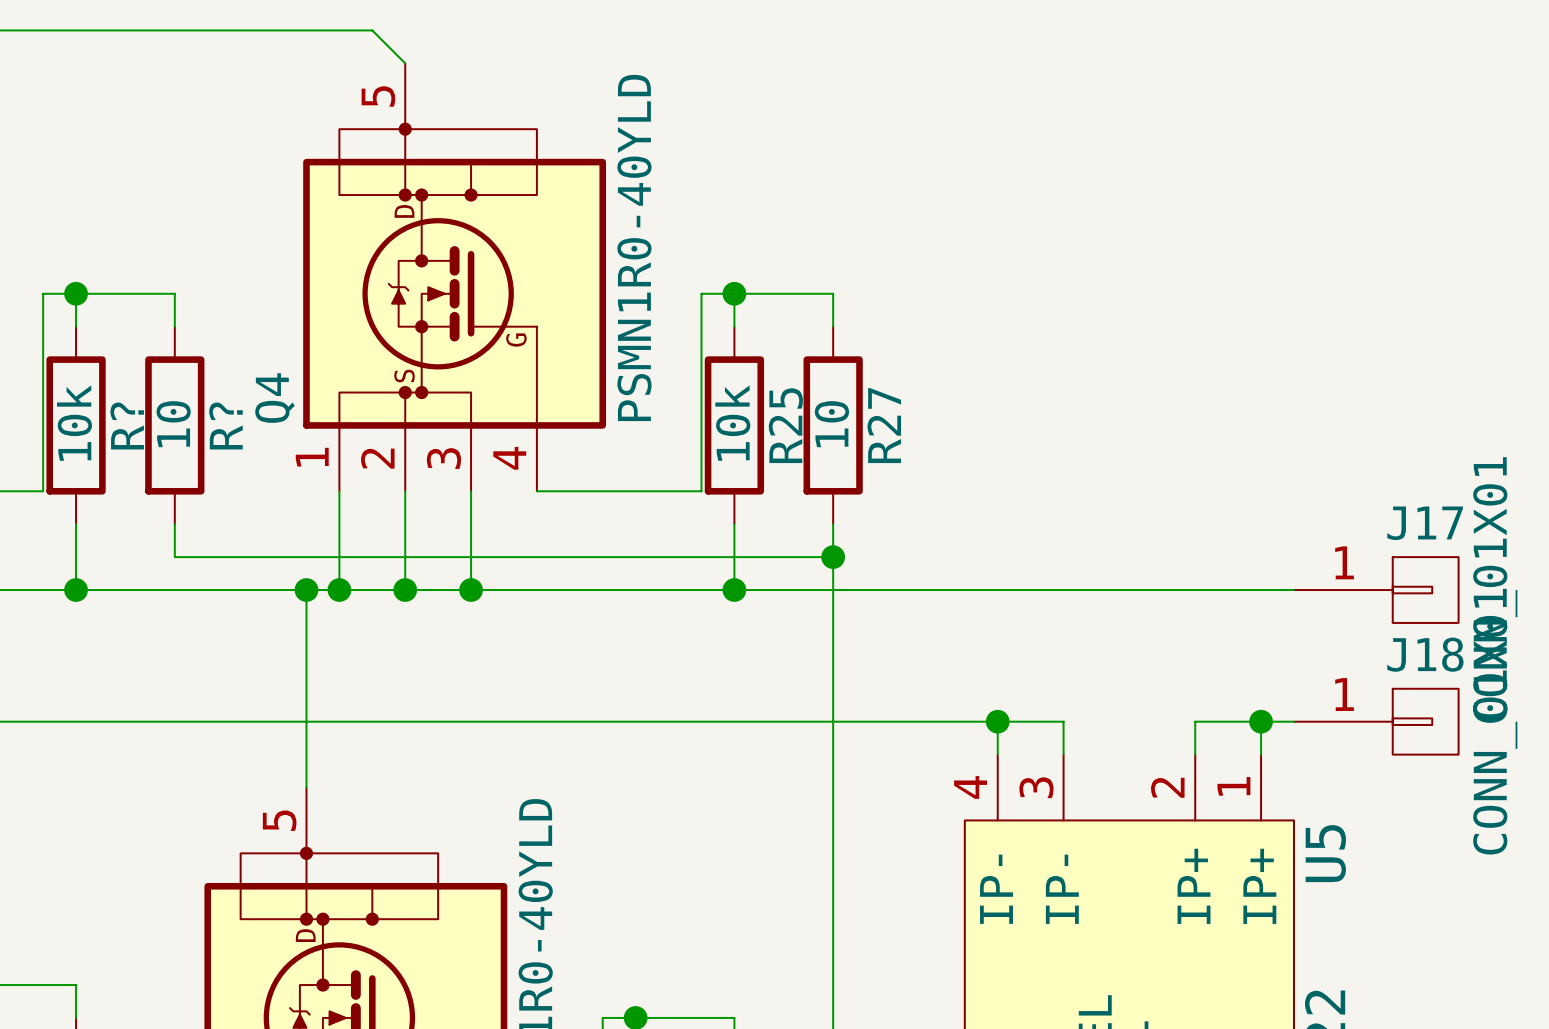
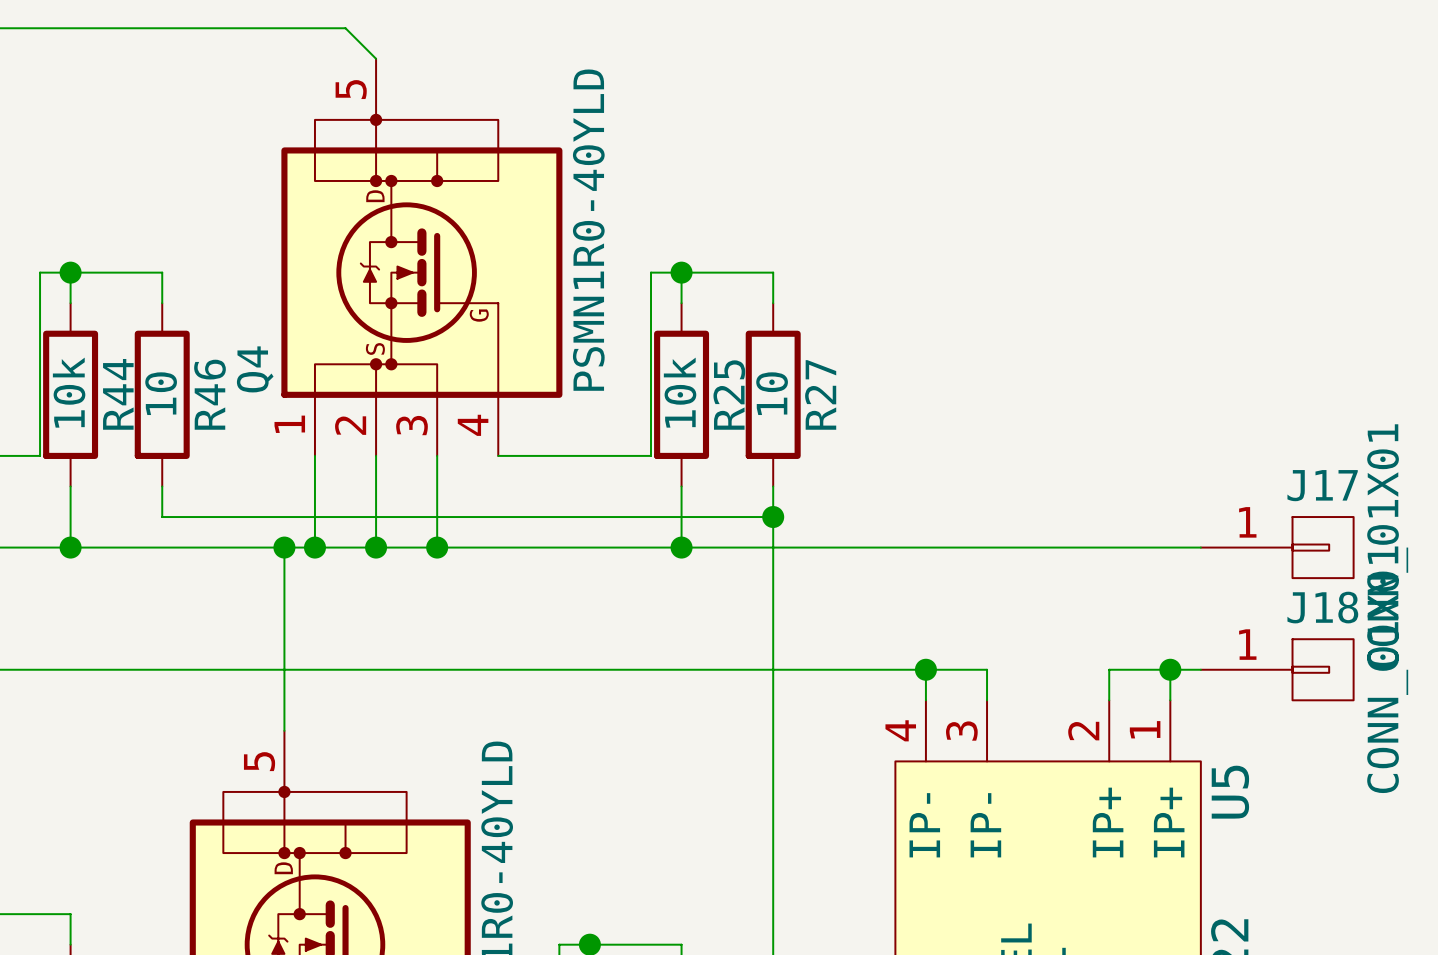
R? name: R? (127, 425) -> R44 (118, 394)
R? name: R? (225, 425) -> R46 (209, 394)

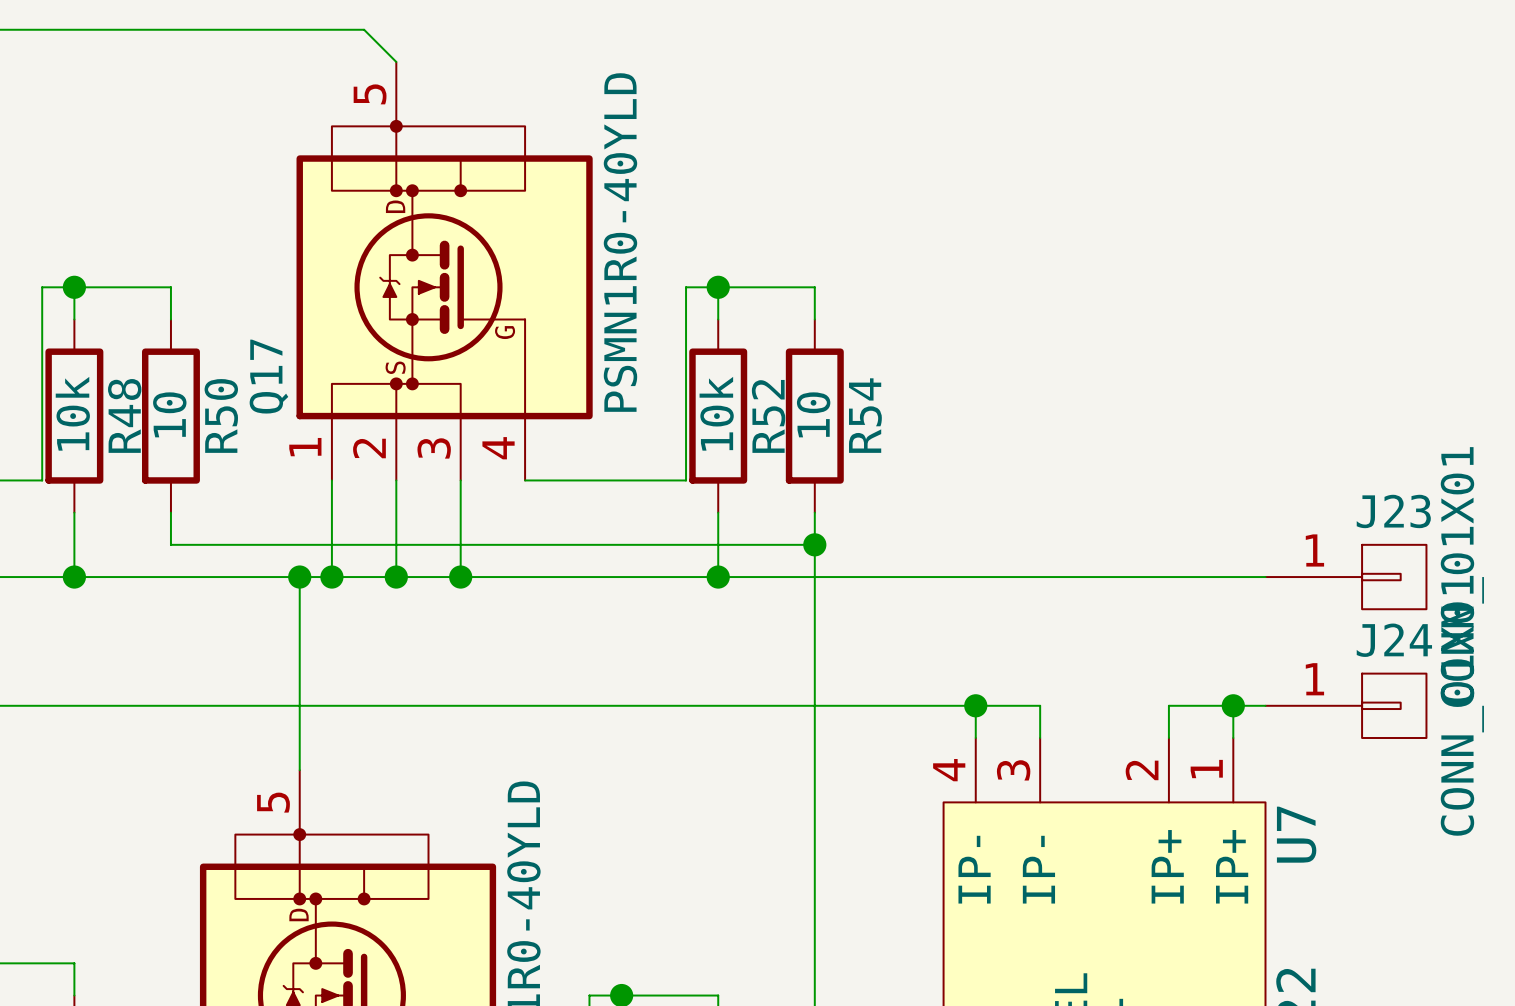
Q4 name: Q4 (255, 369) -> Q17 (268, 376)
R44 name: R44 (118, 394) -> R48 (124, 415)
R46 name: R46 (209, 394) -> R50 (221, 415)
R27 name: R27 (820, 394) -> R54 (865, 415)
R25 name: R25 (729, 395) -> R52 (768, 416)
J17 name: J17 (1322, 485) -> J23 (1393, 511)
J18 name: J18 (1322, 607) -> J24 (1394, 640)
U5 name: U5 (1230, 792) -> U7 (1296, 834)

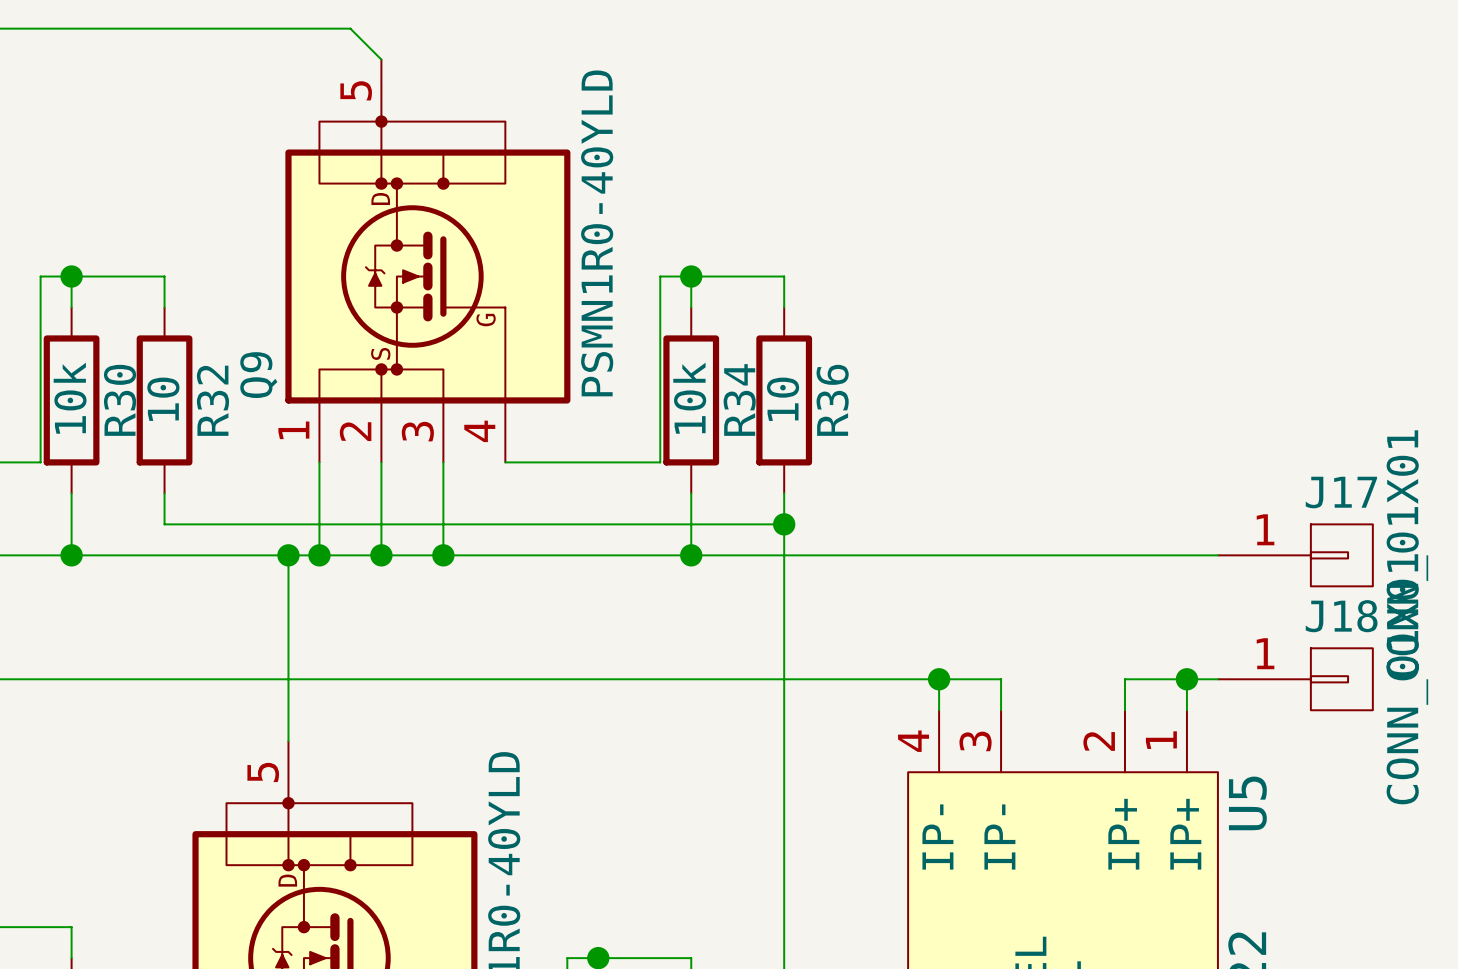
Q17 name: Q17 (268, 376) -> Q9 (258, 375)
R48 name: R48 (124, 415) -> R30 (120, 400)
R50 name: R50 (221, 415) -> R32 (212, 400)
R54 name: R54 (865, 415) -> R36 (832, 400)
R52 name: R52 (768, 416) -> R34 (739, 399)
J23 name: J23 (1393, 511) -> J17 (1341, 492)
J24 name: J24 (1394, 640) -> J18 (1341, 616)
U7 name: U7 (1296, 834) -> U5 (1247, 803)

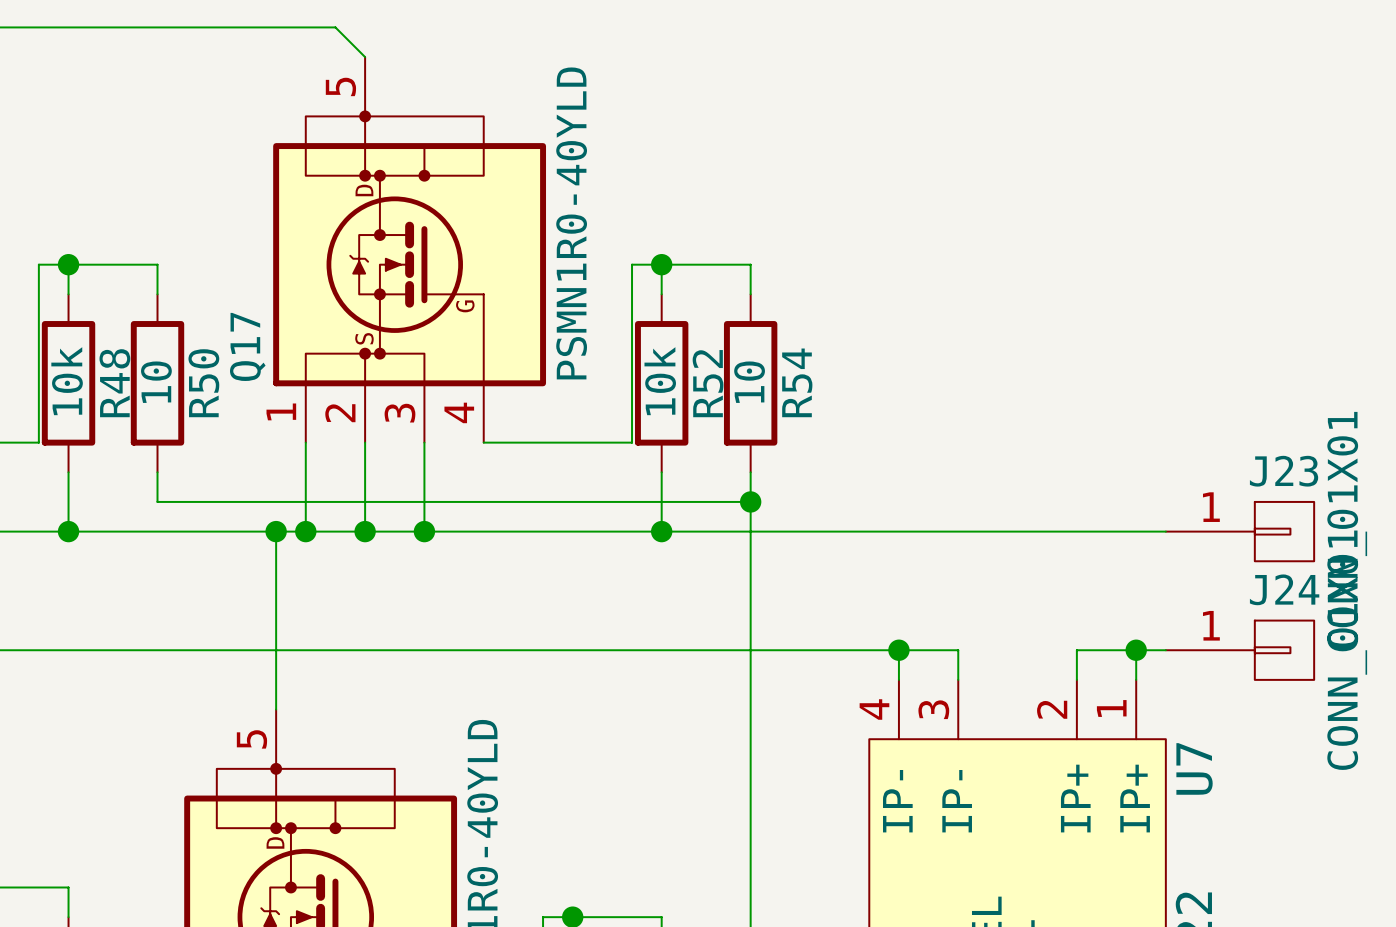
Q9 name: Q9 (258, 375) -> Q17 (247, 346)
R34 name: R34 (739, 399) -> R52 (708, 383)
R30 name: R30 (120, 400) -> R48 (114, 383)
R32 name: R32 (212, 400) -> R50 (203, 383)
R36 name: R36 (832, 400) -> R54 (797, 382)
J17 name: J17 (1341, 492) -> J23 (1284, 471)
J18 name: J18 (1341, 616) -> J24 (1284, 589)
U5 name: U5 (1247, 803) -> U7 (1194, 768)

